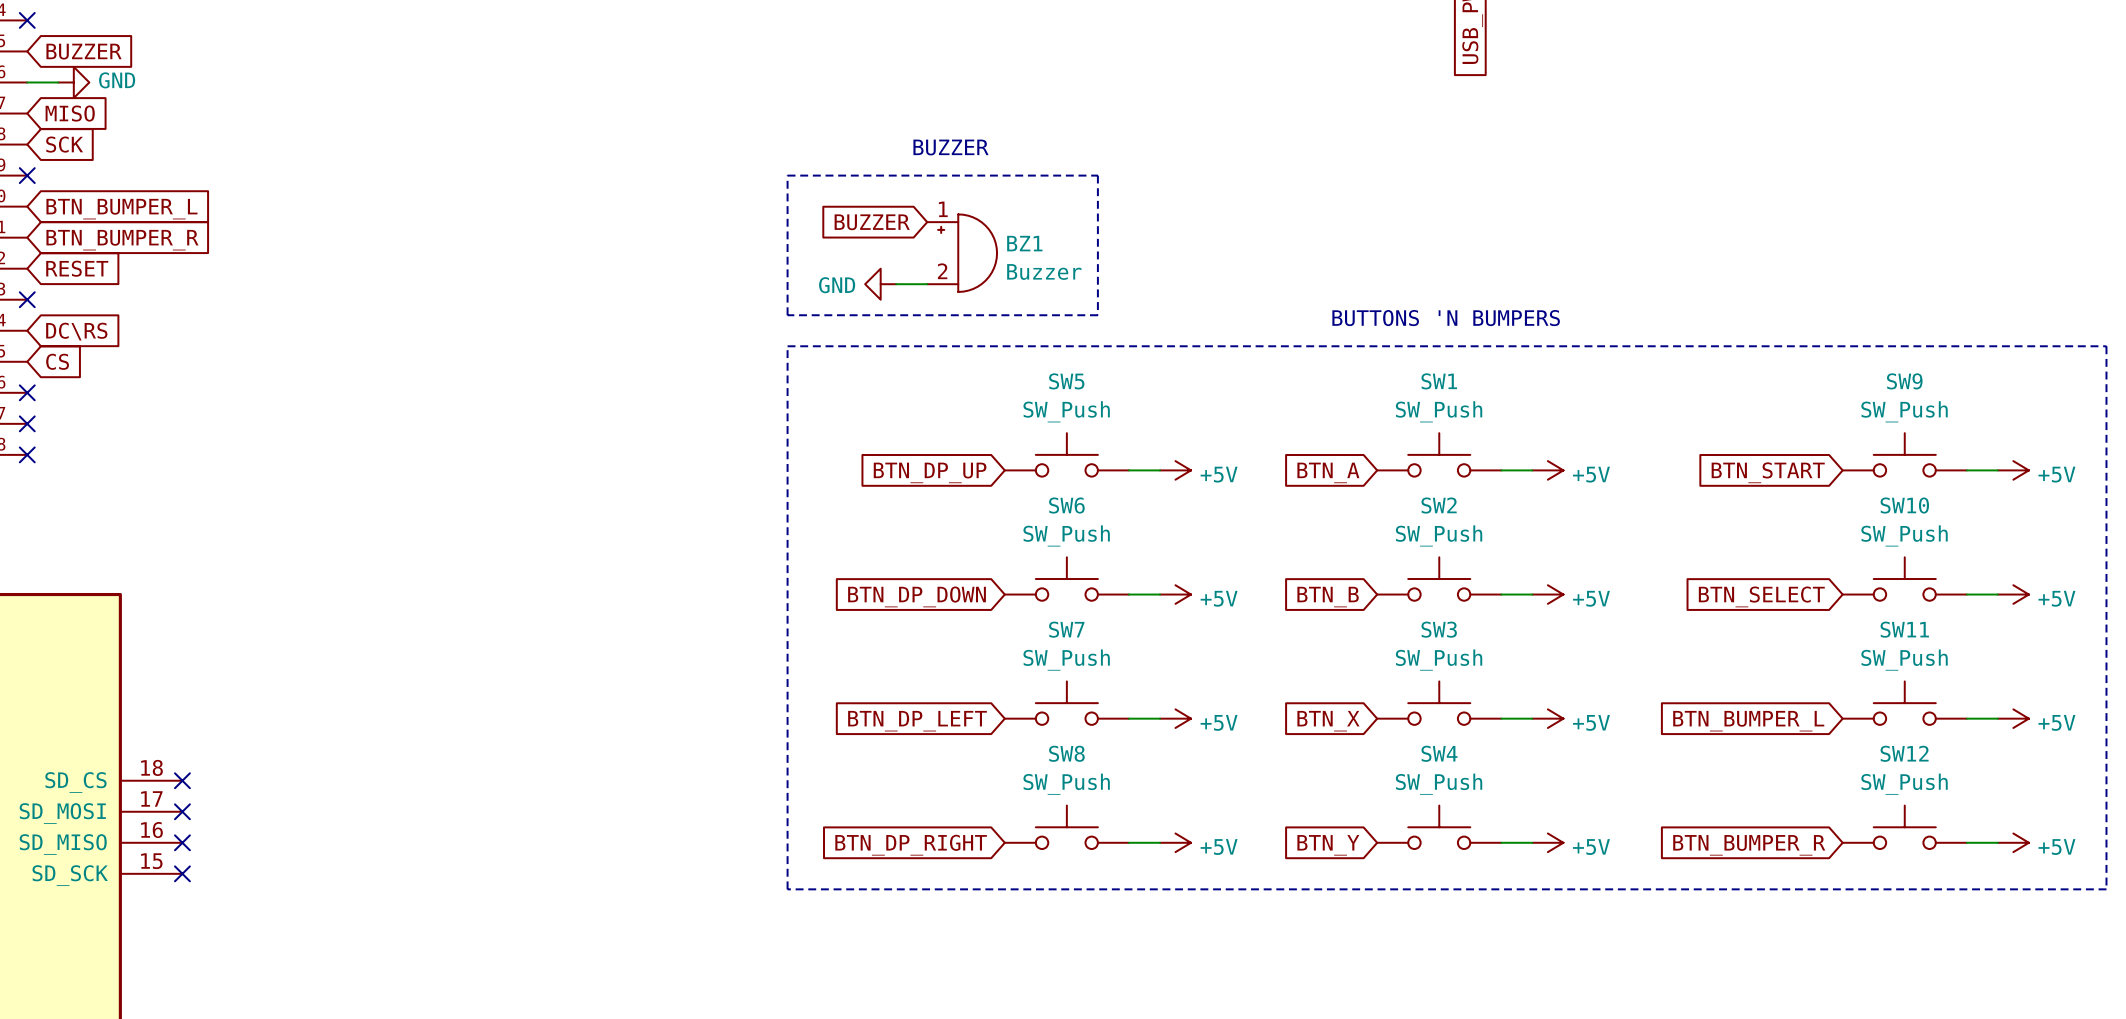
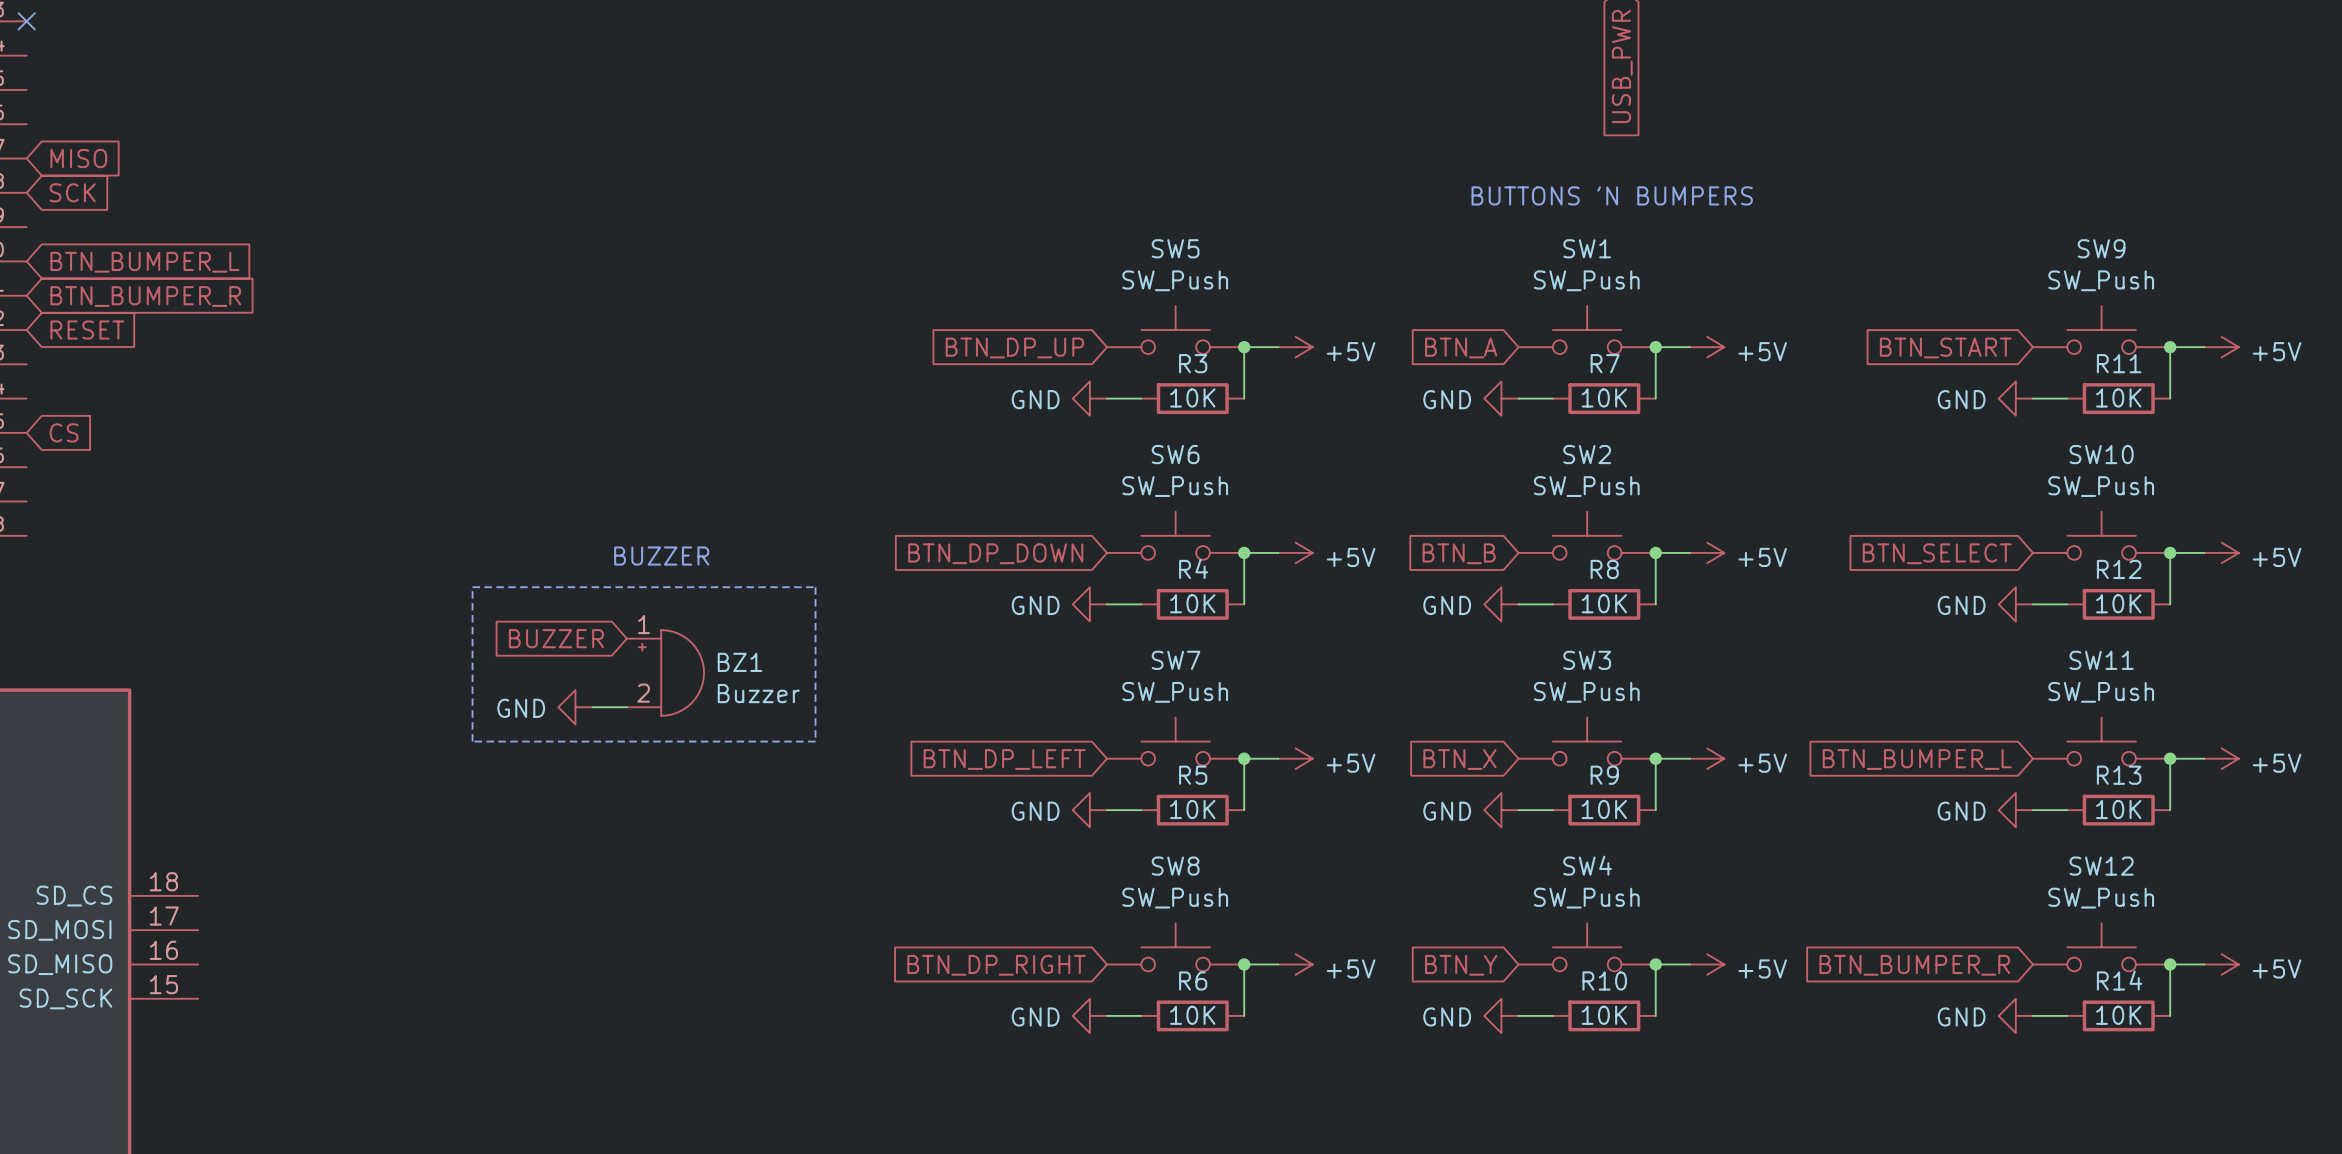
no-connect mark: (27, 20) -> none
global label: BUZZER (84, 51) -> none
wire: (27, 82) (58, 82) -> none
power symbol: GND (73, 82) -> none
text: BUZZER (951, 147) -> none
no-connect mark: (27, 175) -> none
line: (787, 175) (787, 315) (1097, 315) (1097, 175) (787, 175) -> none
global label: BUZZER (872, 222) -> none
BZ1 position: (962, 253) -> (665, 672)
SW5: none -> SW_Push (1175, 330)
SW1: none -> SW_Push (1587, 330)
SW9: none -> SW_Push (2101, 330)
power symbol position: GND (880, 284) -> GND (1089, 398)
wire: (896, 284) (927, 284) -> (1107, 398) (1141, 398)
junction: none -> (1244, 347)
wire: none -> (1278, 347) (1244, 347) (1244, 398)
power symbol: none -> +5V (1295, 347)
junction: none -> (1655, 347)
wire: none -> (1690, 347) (1655, 347) (1655, 398)
power symbol: none -> +5V (1707, 347)
junction: none -> (2170, 347)
wire: none -> (2204, 347) (2170, 347) (2170, 398)
power symbol: none -> +5V (2221, 347)
global label: none -> BTN_DP_UP (1014, 347)
global label: none -> BTN_A (1461, 347)
global label: none -> BTN_START (1945, 347)
no-connect mark: (27, 299) -> none
text position: BUTTONS 'N BUMPERS (1446, 318) -> BUTTONS 'N BUMPERS (1612, 195)
R3: none -> 10K (1192, 398)
power symbol: none -> GND (1501, 398)
wire: none -> (1518, 398) (1552, 398)
R7: none -> 10K (1604, 398)
power symbol: none -> GND (2015, 398)
wire: none -> (2033, 398) (2067, 398)
R11: none -> 10K (2118, 398)
global label: DC\RS (76, 331) -> none
line: (787, 346) (787, 889) (2106, 889) (2106, 346) (787, 346) -> none
SW5 name: SW5 (1066, 381) -> SW6 (1175, 454)
SW1 name: SW1 (1439, 381) -> SW2 (1587, 454)
SW9 name: SW9 (1904, 381) -> SW10 (2101, 454)
no-connect mark: (27, 392) -> none
no-connect mark: (27, 423) -> none
no-connect mark: (27, 454) -> none
wire: none -> (1244, 552) (1244, 604)
junction: none -> (1244, 552)
wire: none -> (1655, 552) (1655, 604)
junction: none -> (1655, 552)
wire: none -> (2170, 552) (2170, 604)
junction: none -> (2170, 552)
global label: BTN_DP_UP (930, 472) -> BTN_DP_DOWN (995, 553)
global label: BTN_A (1328, 472) -> BTN_B (1459, 553)
global label: BTN_START (1768, 472) -> BTN_SELECT (1937, 553)
text: none -> BUZZER (661, 556)
line: none -> (472, 587) (472, 741) (815, 741) (815, 587) (472, 587)
power symbol: none -> GND (1089, 604)
R4: none -> 10K (1192, 604)
power symbol: none -> GND (1501, 604)
R8: none -> 10K (1604, 604)
power symbol: none -> GND (2015, 604)
R12: none -> 10K (2118, 604)
global label: none -> BUZZER (556, 638)
SW6: SW_Push (1066, 579) -> none
SW2: SW_Push (1439, 579) -> none
SW10: SW_Push (1904, 579) -> none
wire: (1128, 594) (1159, 594) -> (1107, 604) (1141, 604)
power symbol: +5V (1175, 594) -> none
wire: (1501, 594) (1532, 594) -> (1518, 604) (1552, 604)
power symbol: +5V (1547, 594) -> none
wire: (1966, 594) (1997, 594) -> (2033, 604) (2067, 604)
power symbol: +5V (2013, 594) -> none
global label: BTN_DP_DOWN (917, 596) -> none
global label: BTN_SELECT (1761, 596) -> none
global label: BTN_B (1328, 597) -> none
power symbol: none -> GND (575, 707)
wire: none -> (592, 707) (626, 707)
junction: none -> (1244, 758)
wire: none -> (1278, 758) (1244, 758) (1244, 810)
power symbol: none -> +5V (1295, 758)
junction: none -> (1655, 758)
wire: none -> (1690, 758) (1655, 758) (1655, 810)
power symbol: none -> +5V (1707, 758)
junction: none -> (2170, 758)
wire: none -> (2204, 758) (2170, 758) (2170, 810)
power symbol: none -> +5V (2221, 758)
power symbol: none -> GND (1089, 810)
SW7 position: (1066, 703) -> (1175, 741)
R5: none -> 10K (1192, 810)
power symbol: none -> GND (1501, 810)
SW3 position: (1439, 703) -> (1587, 741)
R9: none -> 10K (1604, 810)
power symbol: none -> GND (2015, 810)
SW11 position: (1904, 703) -> (2101, 741)
R13: none -> 10K (2118, 810)
wire: (1128, 718) (1159, 718) -> (1107, 810) (1141, 810)
power symbol: +5V (1175, 718) -> none
wire: (1501, 718) (1532, 718) -> (1518, 810) (1552, 810)
power symbol: +5V (1547, 718) -> none
wire: (1966, 718) (1997, 718) -> (2033, 810) (2067, 810)
power symbol: +5V (2013, 718) -> none
global label position: BTN_DP_LEFT (917, 721) -> BTN_DP_LEFT (1004, 759)
global label position: BTN_X (1328, 721) -> BTN_X (1459, 759)
global label position: BTN_BUMPER_L (1748, 721) -> BTN_BUMPER_L (1917, 759)
no-connect mark: (182, 780) -> none
no-connect mark: (182, 811) -> none
no-connect mark: (182, 842) -> none
wire: none -> (1244, 964) (1244, 1015)
junction: none -> (1244, 964)
wire: none -> (1655, 964) (1655, 1015)
junction: none -> (1655, 964)
wire: none -> (2170, 964) (2170, 1015)
junction: none -> (2170, 964)
no-connect mark: (182, 873) -> none
power symbol: none -> GND (1089, 1015)
R6: none -> 10K (1192, 1015)
power symbol: none -> GND (1501, 1015)
R10: none -> 10K (1604, 1015)
power symbol: none -> GND (2015, 1015)
R14: none -> 10K (2118, 1015)

